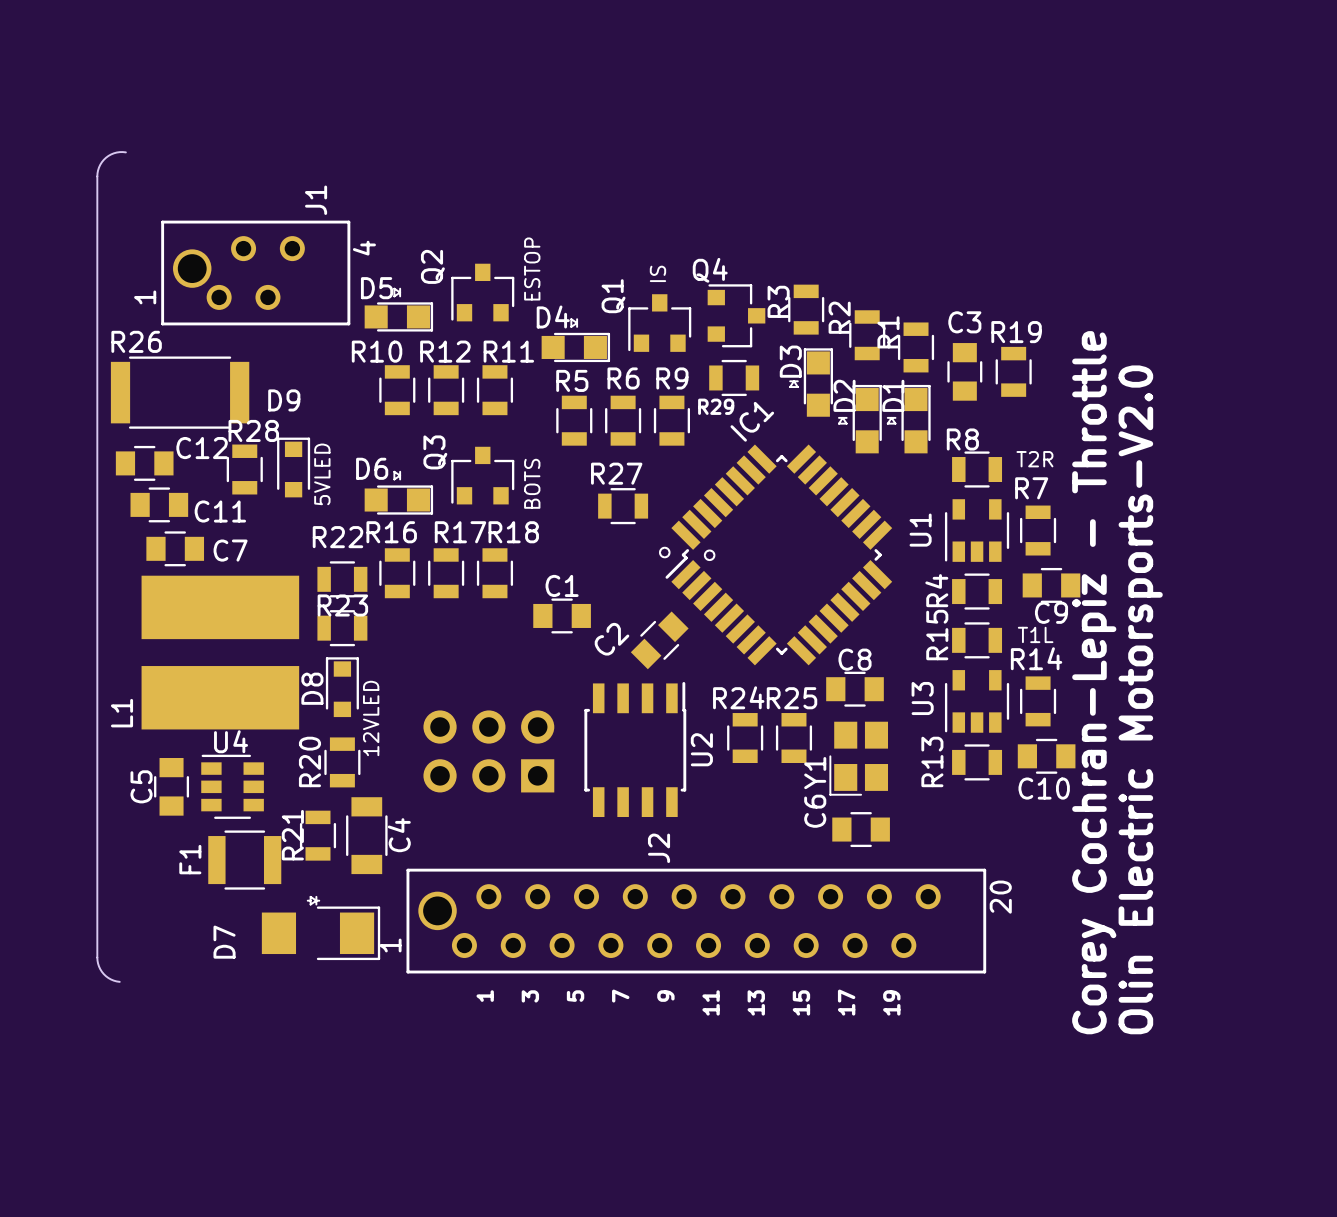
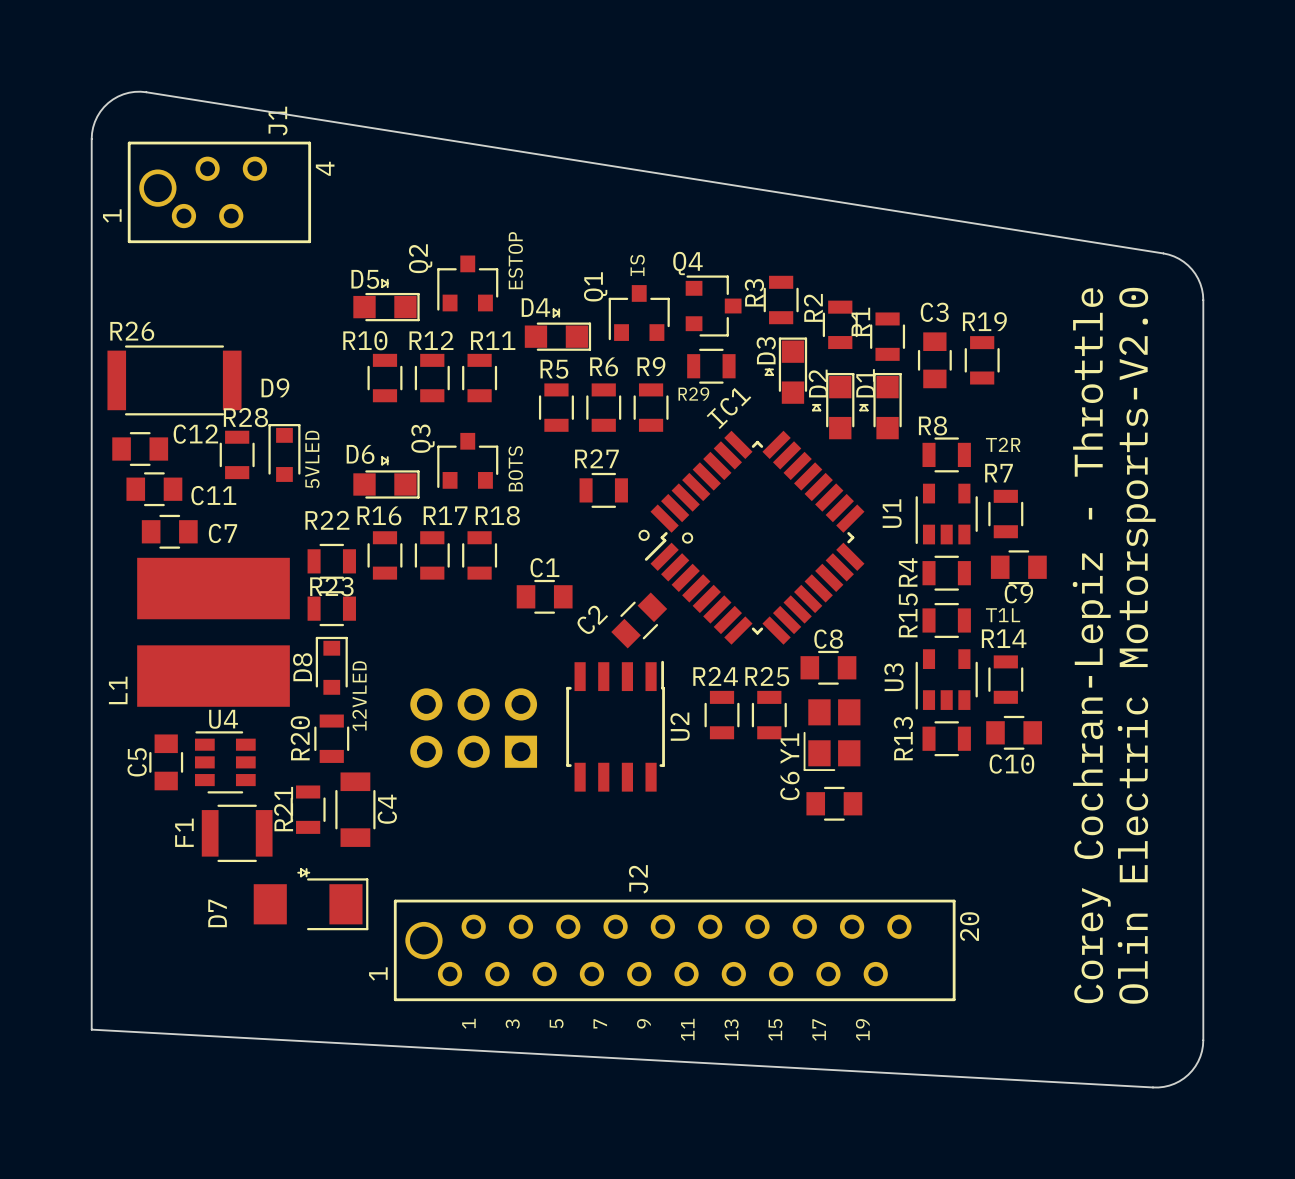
board edge: none -> (146, 92) (1163, 253) (1174, 256) (1188, 265) (1198, 278) (1203, 300) (1203, 1040) (1200, 1056) (1192, 1070) (1174, 1083) (1152, 1087) (91, 1029) (91, 138) (94, 121) (108, 103) (123, 94) (146, 92)
board edge: (125, 152) (113, 153) (106, 157) (100, 164) (97, 176) (97, 957) (98, 966) (103, 974) (111, 979) (119, 981) -> none
J1 position: (255, 273) -> (219, 192)
text position: Corey Cochran-Lepiz - Throttle (1094, 682) -> Corey Cochran-Lepiz - Throttle (1091, 645)
text position: Olin Electric Motorsports-V2.0 (1140, 699) -> Olin Electric Motorsports-V2.0 (1136, 645)
J2 position: (696, 921) -> (674, 950)
text position: 1 (485, 996) -> 1 (468, 1023)
text position: 3 (530, 996) -> 3 (512, 1024)
text position: 5 (575, 996) -> 5 (556, 1023)
text position: 7 (620, 996) -> 7 (600, 1023)
text position: 9 (665, 996) -> 9 (643, 1023)
text position: 11 (711, 1002) -> 11 (687, 1029)
text position: 13 (756, 1002) -> 13 (731, 1030)
text position: 15 (801, 1002) -> 15 (775, 1029)
text position: 17 (846, 1002) -> 17 (819, 1029)
text position: 19 (891, 1002) -> 19 (862, 1029)

